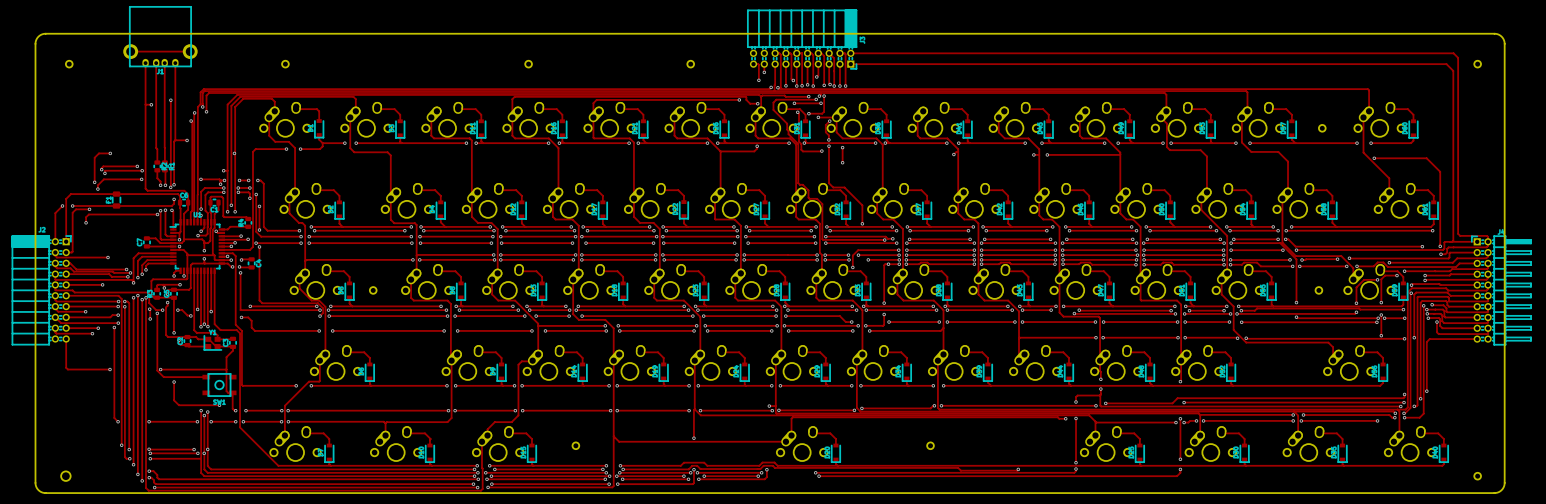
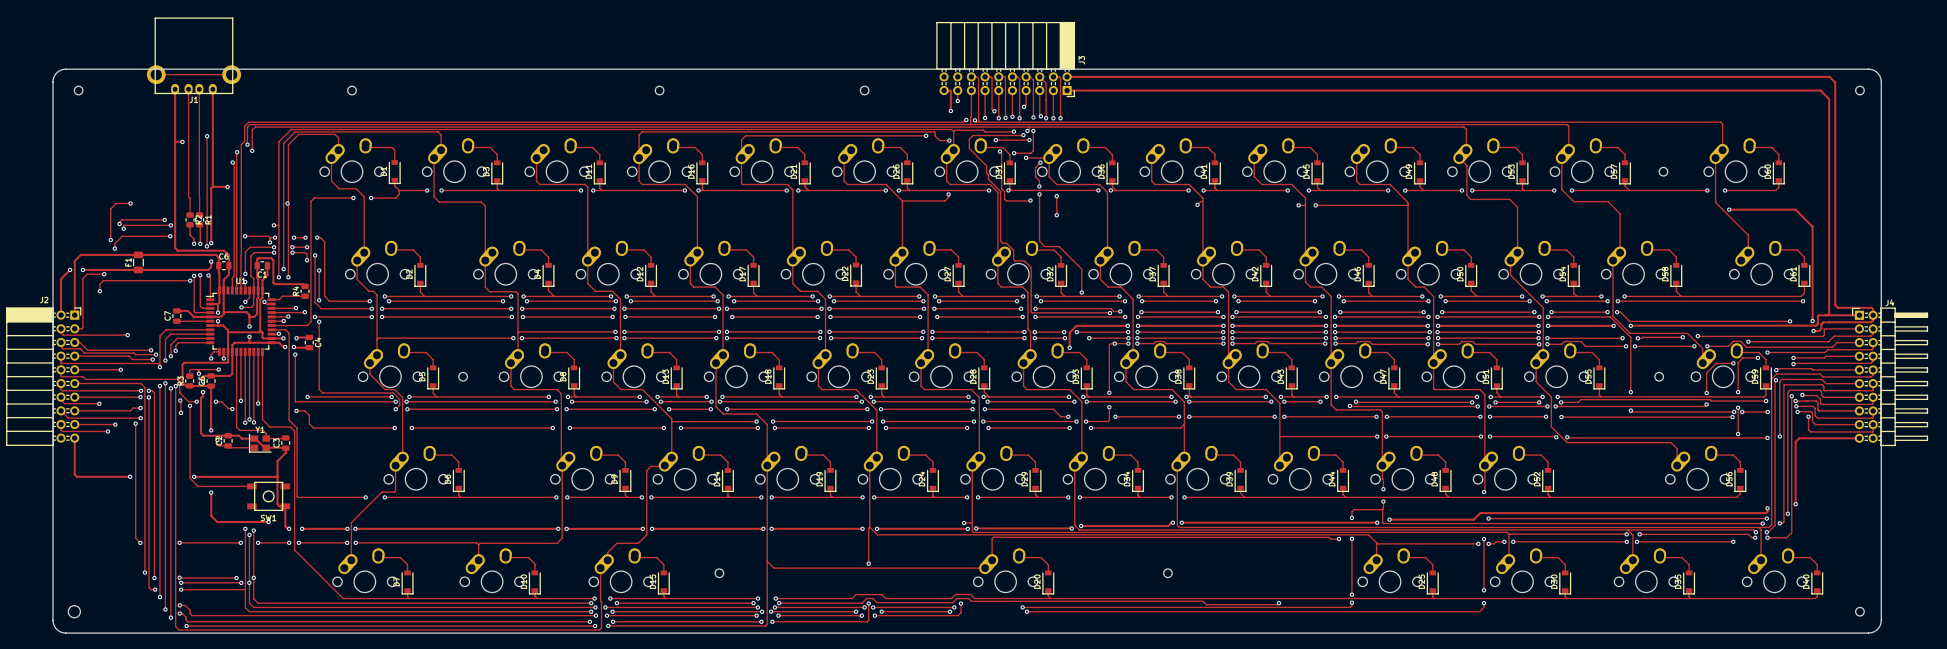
board edge: (59, 493) (41, 492) (36, 488) (35, 482) (35, 43) (38, 36) (45, 33) (1497, 34) (1502, 37) (1504, 43) (1504, 482) (1499, 491) (1484, 493) -> (65, 633) (56, 629) (52, 620) (52, 82) (56, 72) (65, 69) (1871, 69) (1878, 74) (1881, 82) (1881, 620) (1877, 629) (1868, 633)

